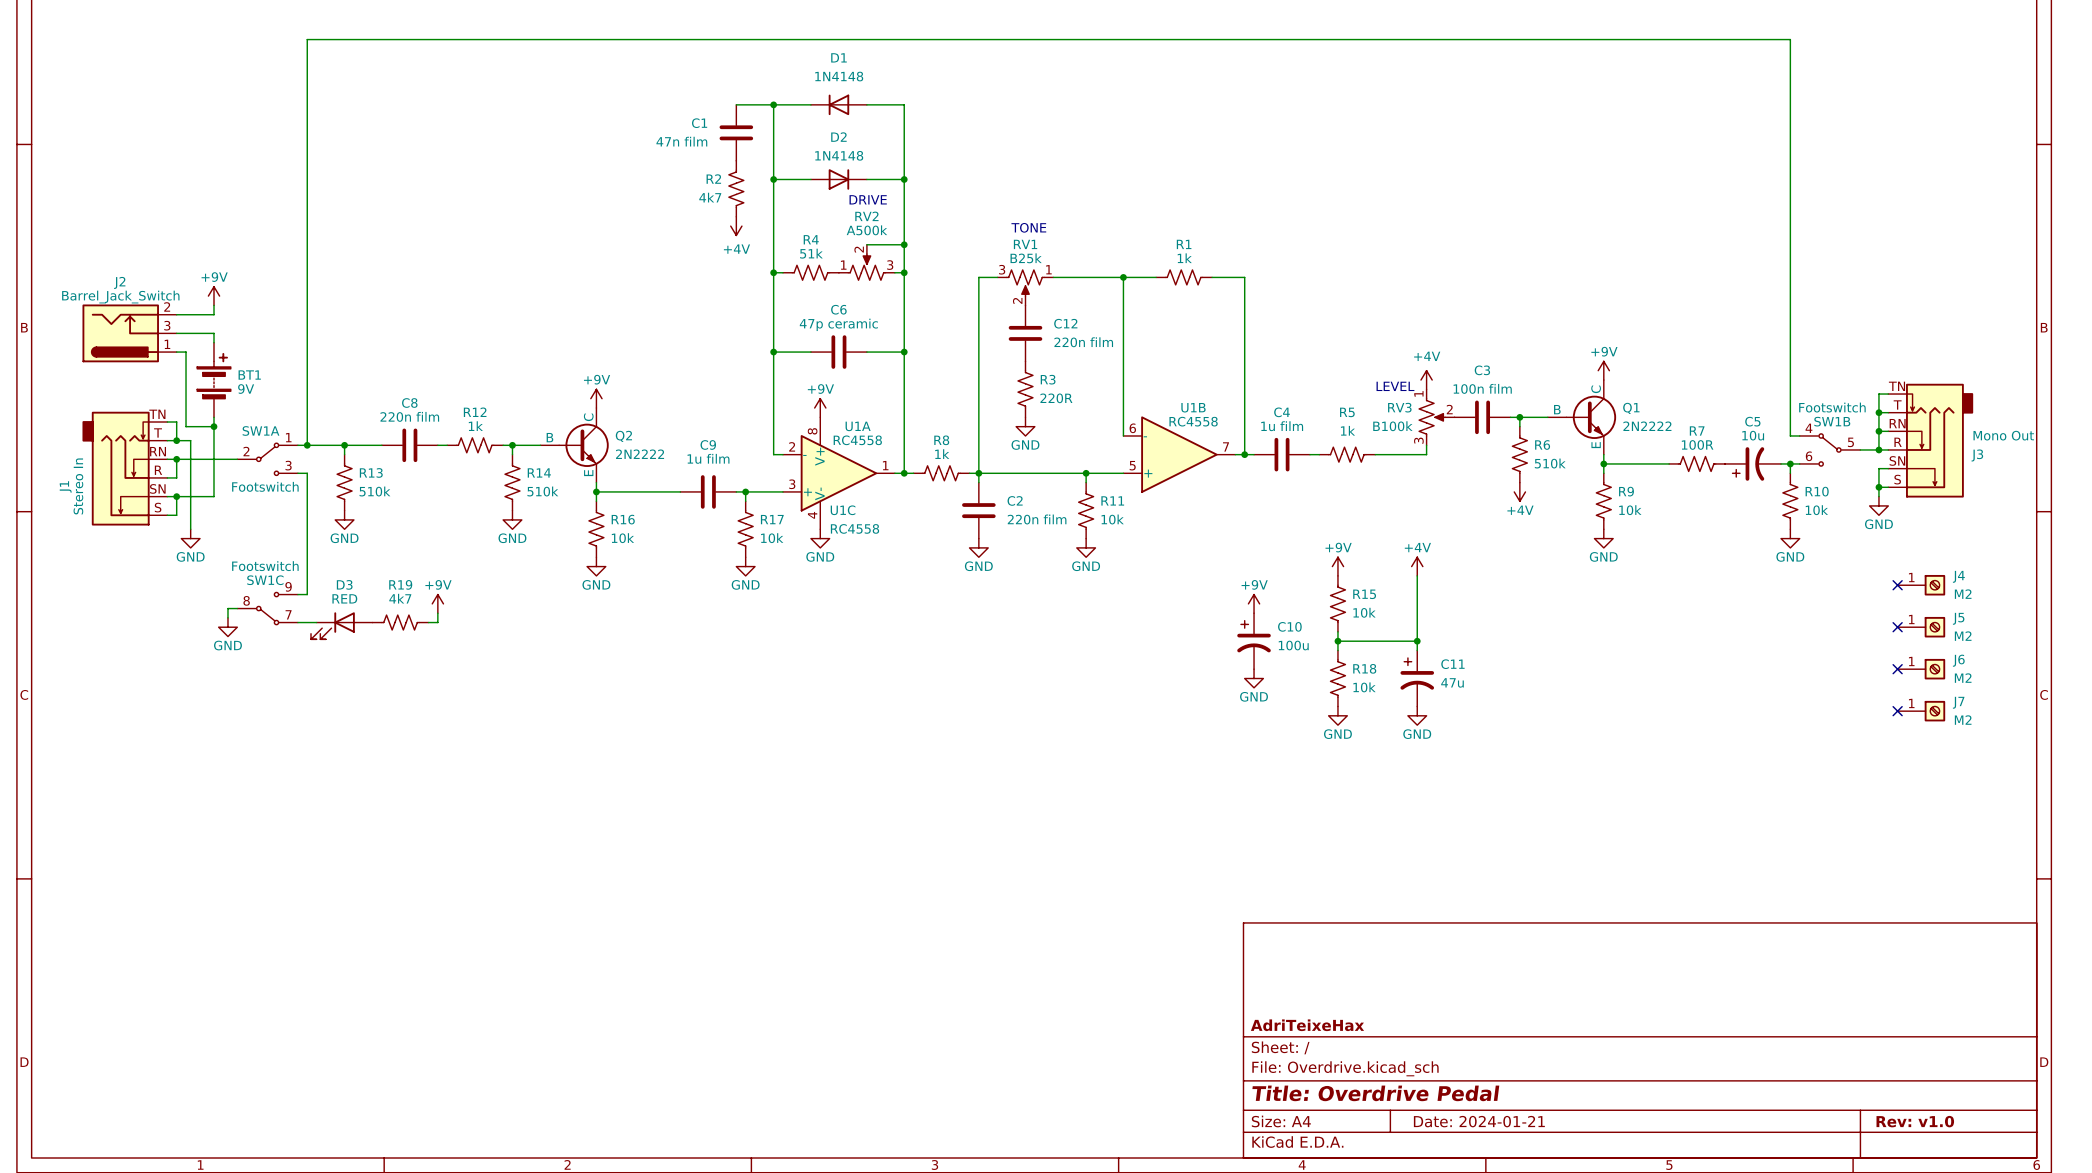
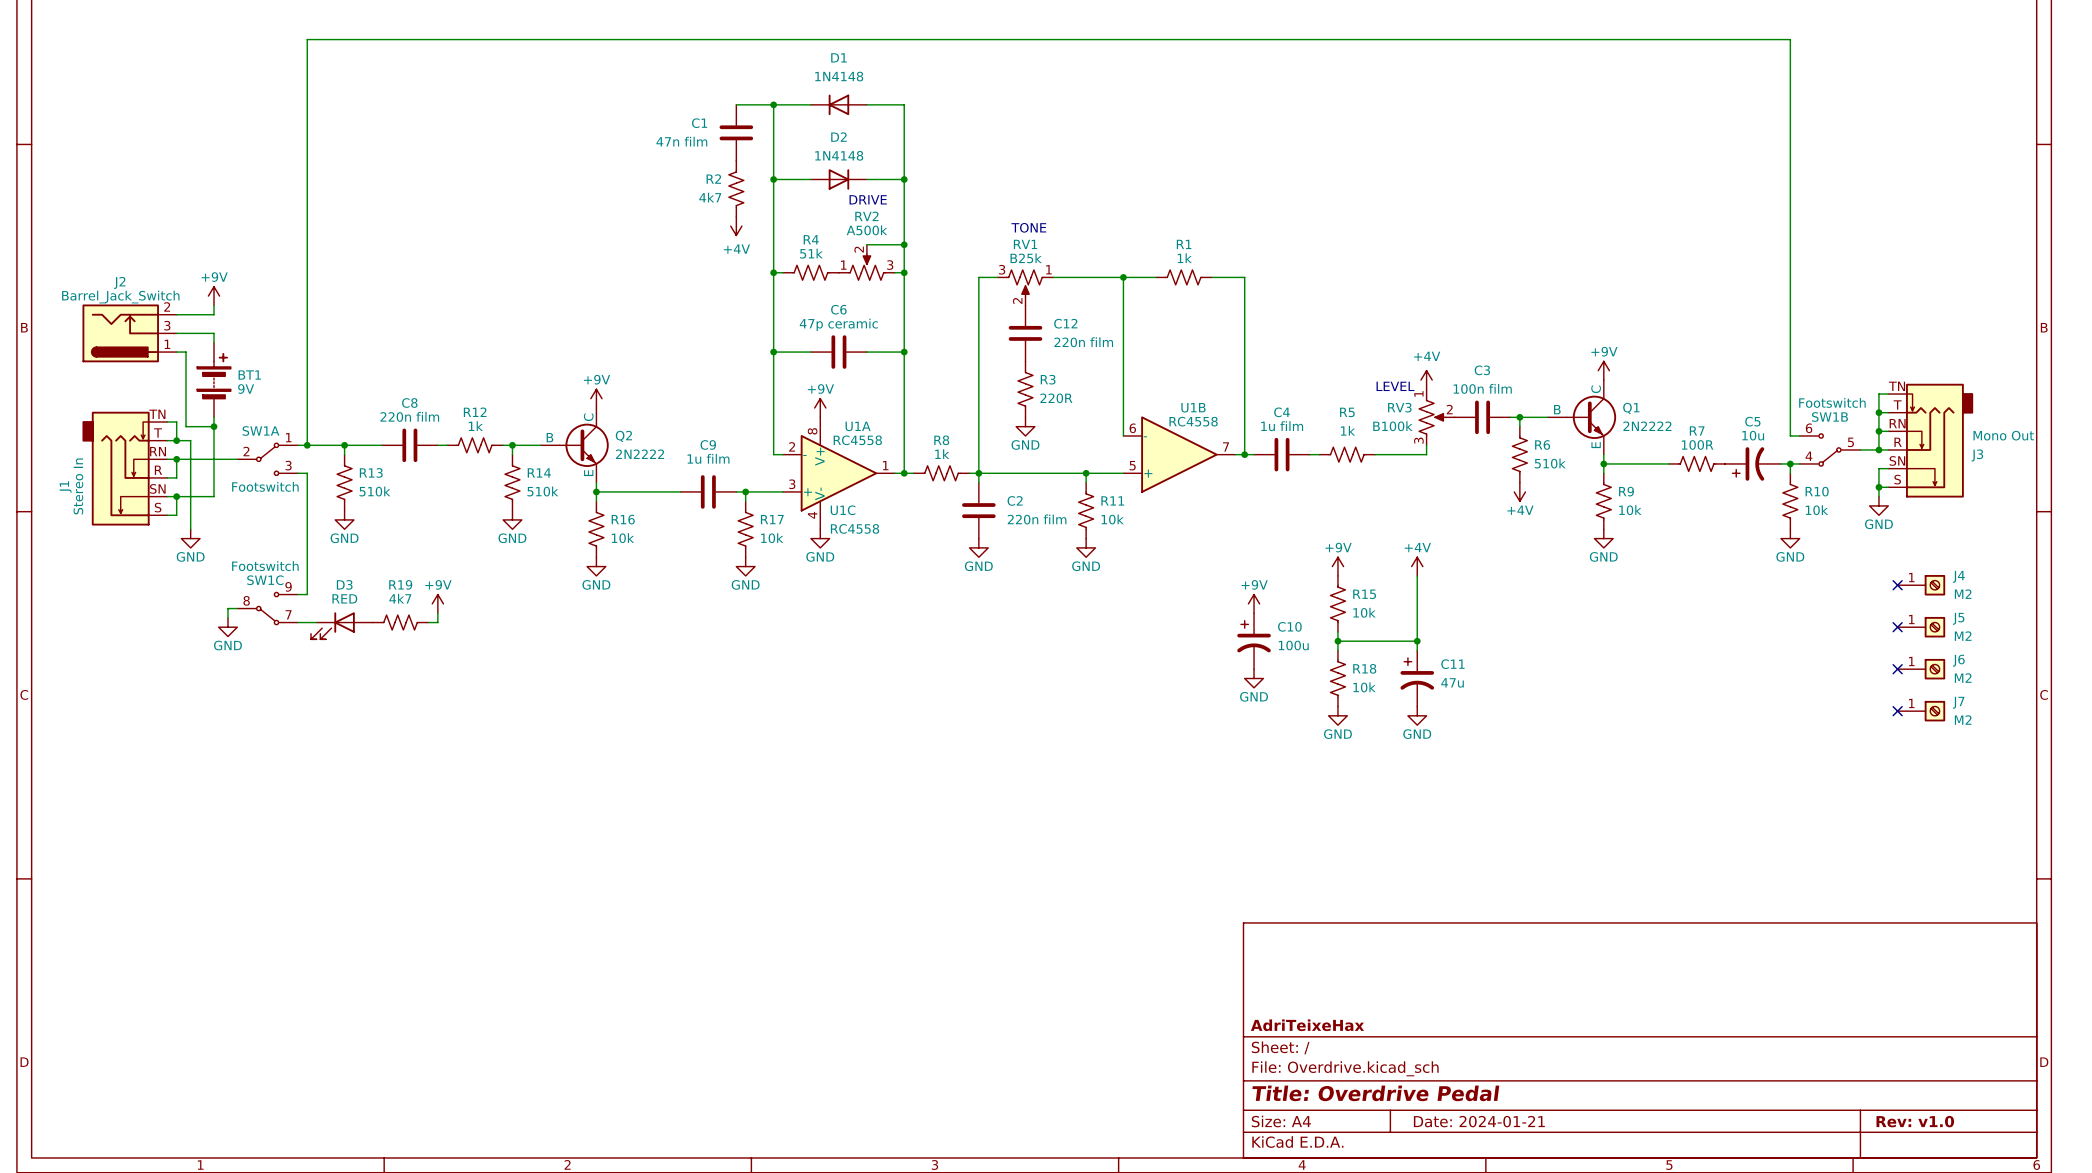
SW1B flip: as is (1830, 449) -> up-down (1830, 449)

